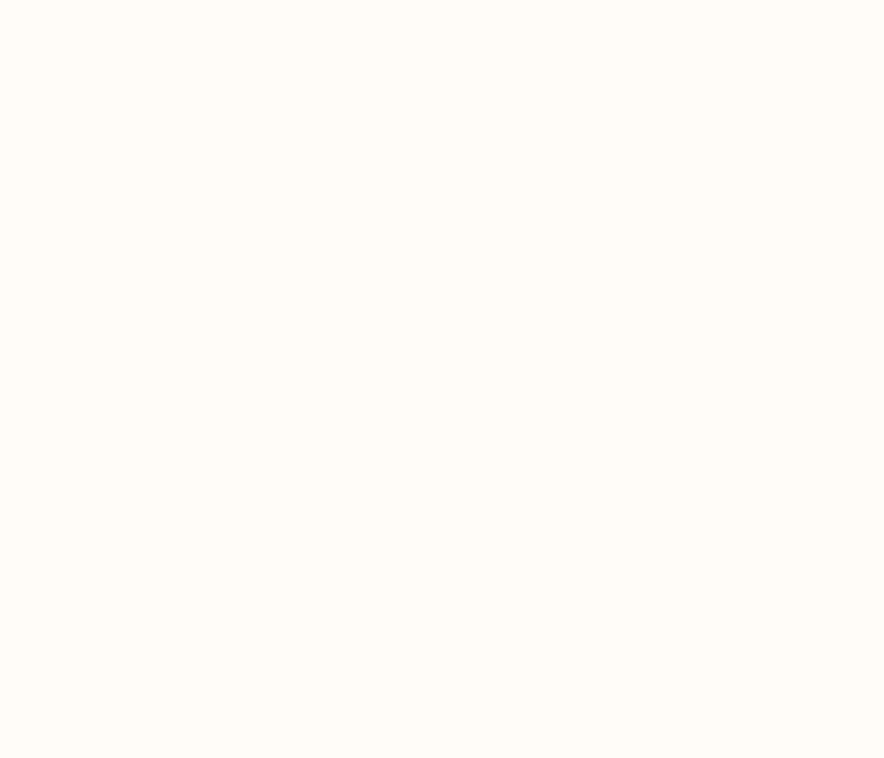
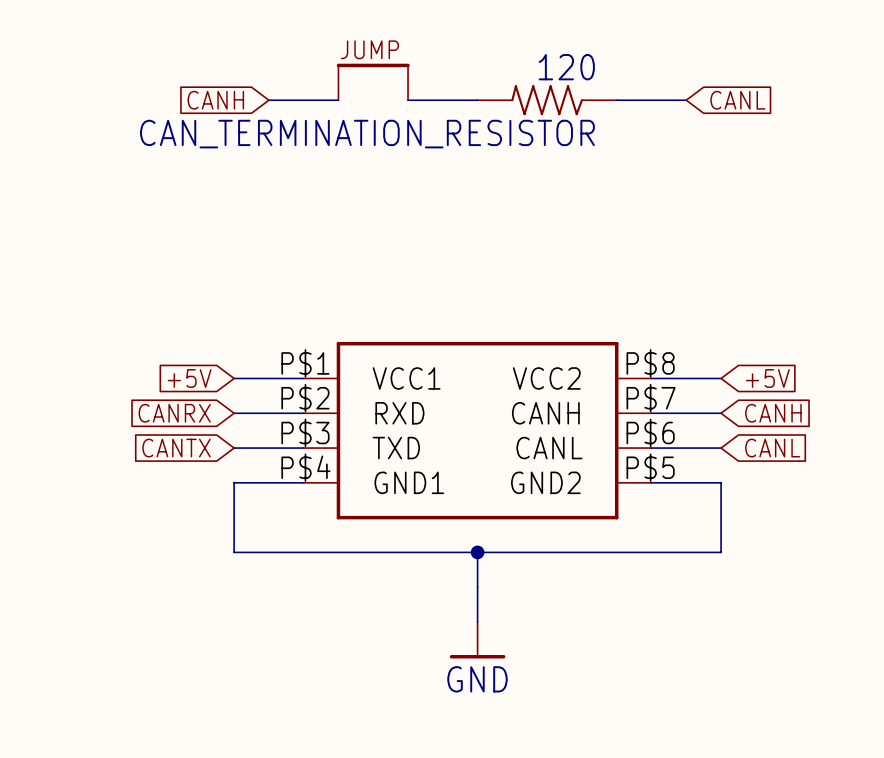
part: none -> (373, 81)
global label: none -> CANH (215, 100)
wire: none -> (268, 100) (338, 100)
wire: none -> (408, 100) (477, 100)
CAN_TERMINATION_RESISTOR: none -> 120 (547, 100)
wire: none -> (616, 100) (686, 100)
global label: none -> CANL (737, 100)
global label: none -> +5V (189, 378)
wire: none -> (234, 378) (303, 378)
wire: none -> (651, 378) (721, 378)
global label: none -> +5V (767, 378)
global label: none -> CANRX (174, 413)
wire: none -> (234, 413) (303, 413)
wire: none -> (651, 413) (721, 413)
global label: none -> CANH (773, 413)
part: none -> (477, 430)
global label: none -> CANTX (176, 448)
wire: none -> (234, 448) (303, 448)
wire: none -> (651, 448) (721, 448)
global label: none -> CANL (772, 448)
wire: none -> (303, 482) (234, 482) (234, 552) (721, 552) (721, 482) (651, 482)
wire: none -> (477, 552) (477, 621)
junction: none -> (477, 552)
power symbol: none -> GND (477, 640)

